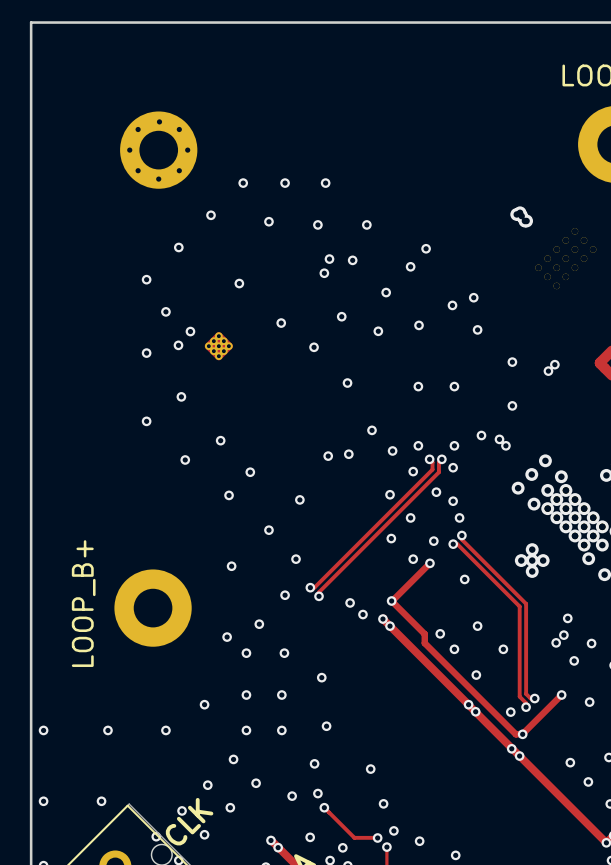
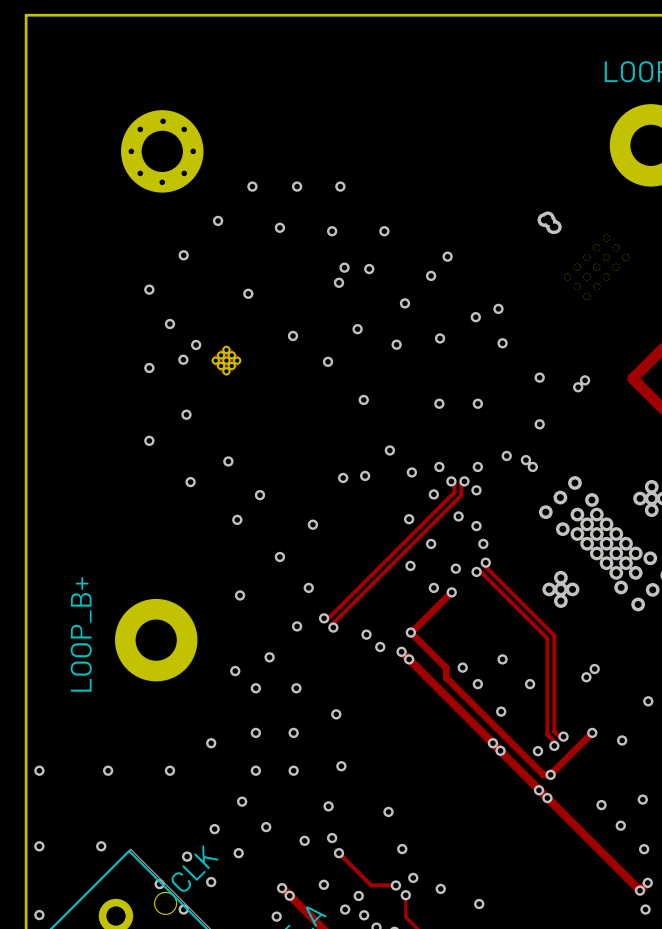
via: (464, 579) -> none
via: (567, 618) -> none
via: (591, 643) -> none
via: (574, 660) -> none

